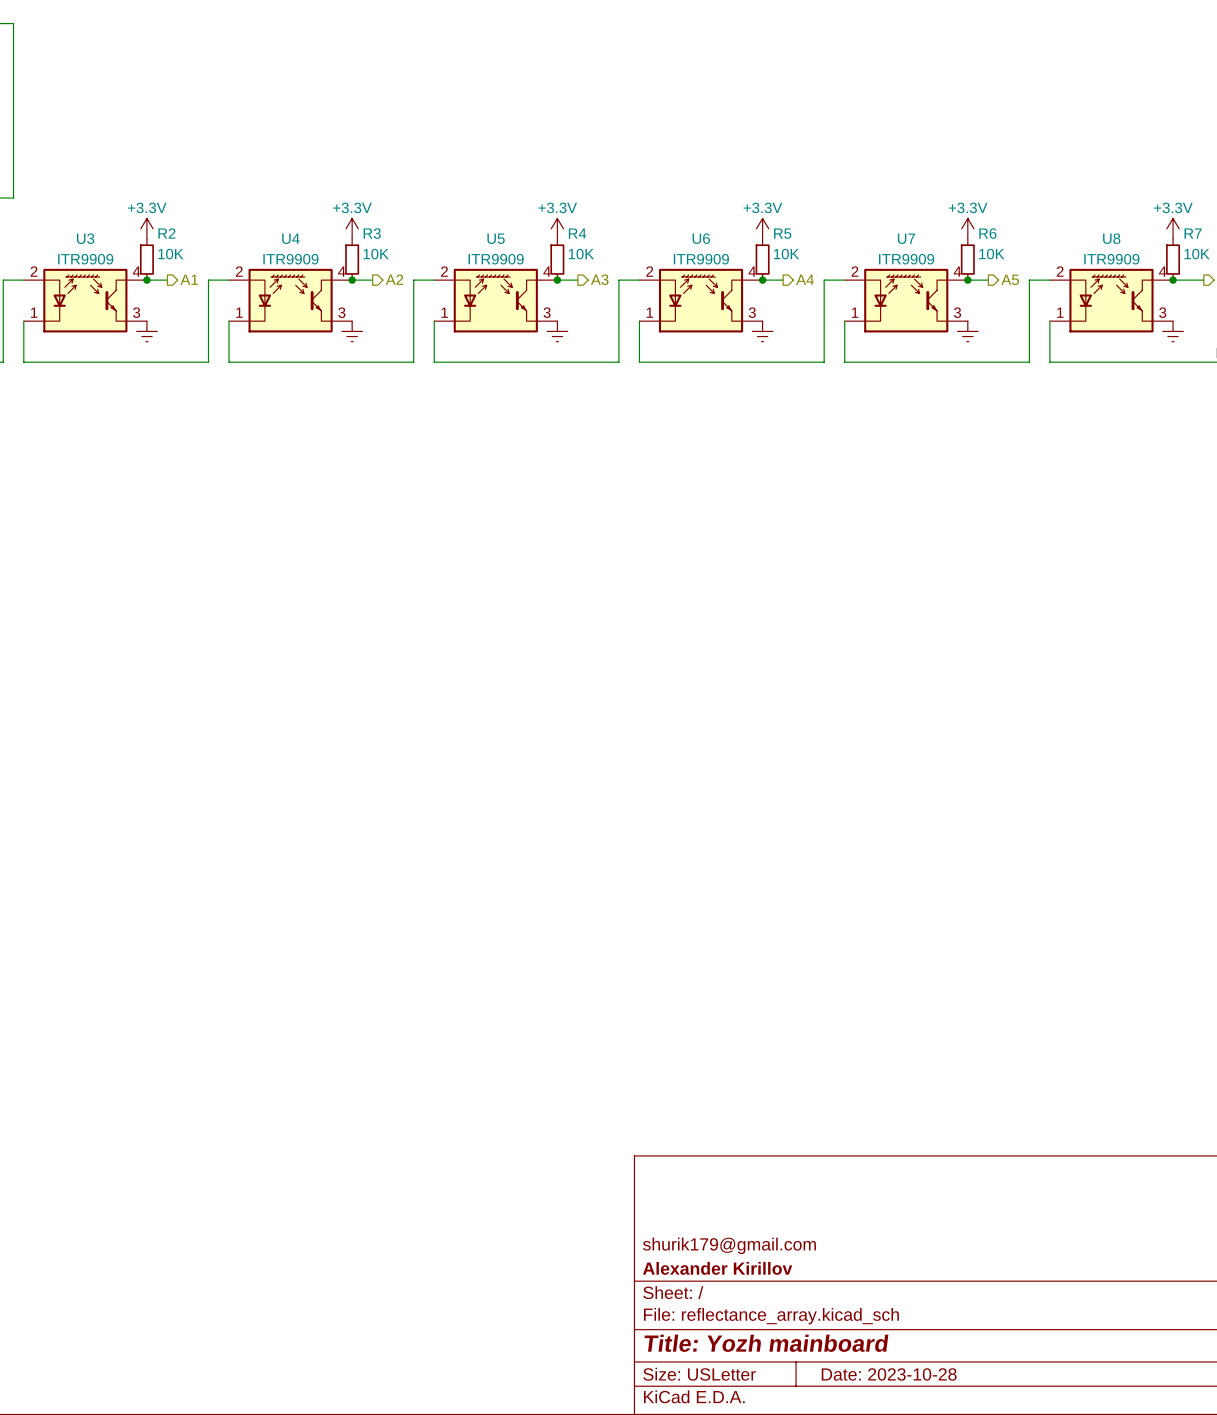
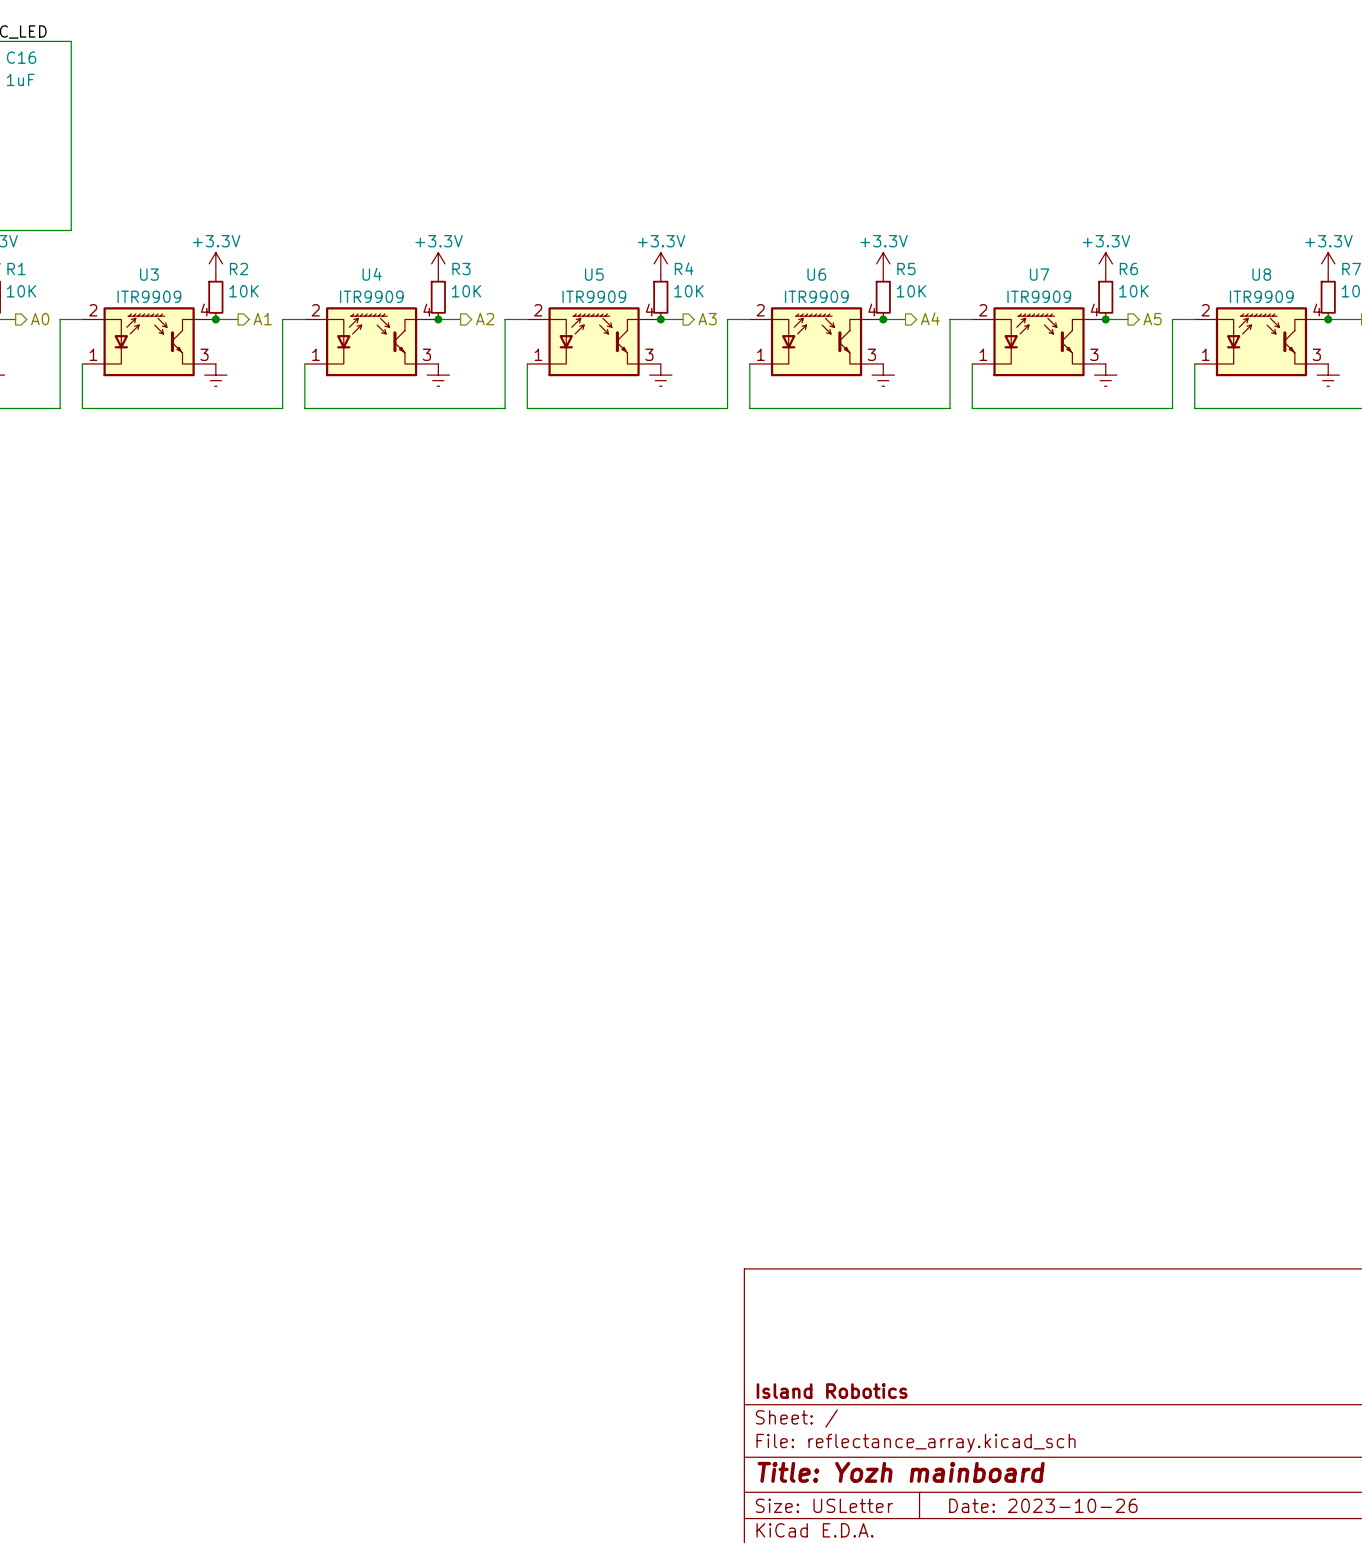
title block: shurik179@gmail.com (729, 1245) -> none
title block: Alexander Kirillov (717, 1268) -> Island Robotics (832, 1391)
title block: Date: 2023-10-28 (889, 1374) -> Date: 2023-10-26 (1043, 1505)

